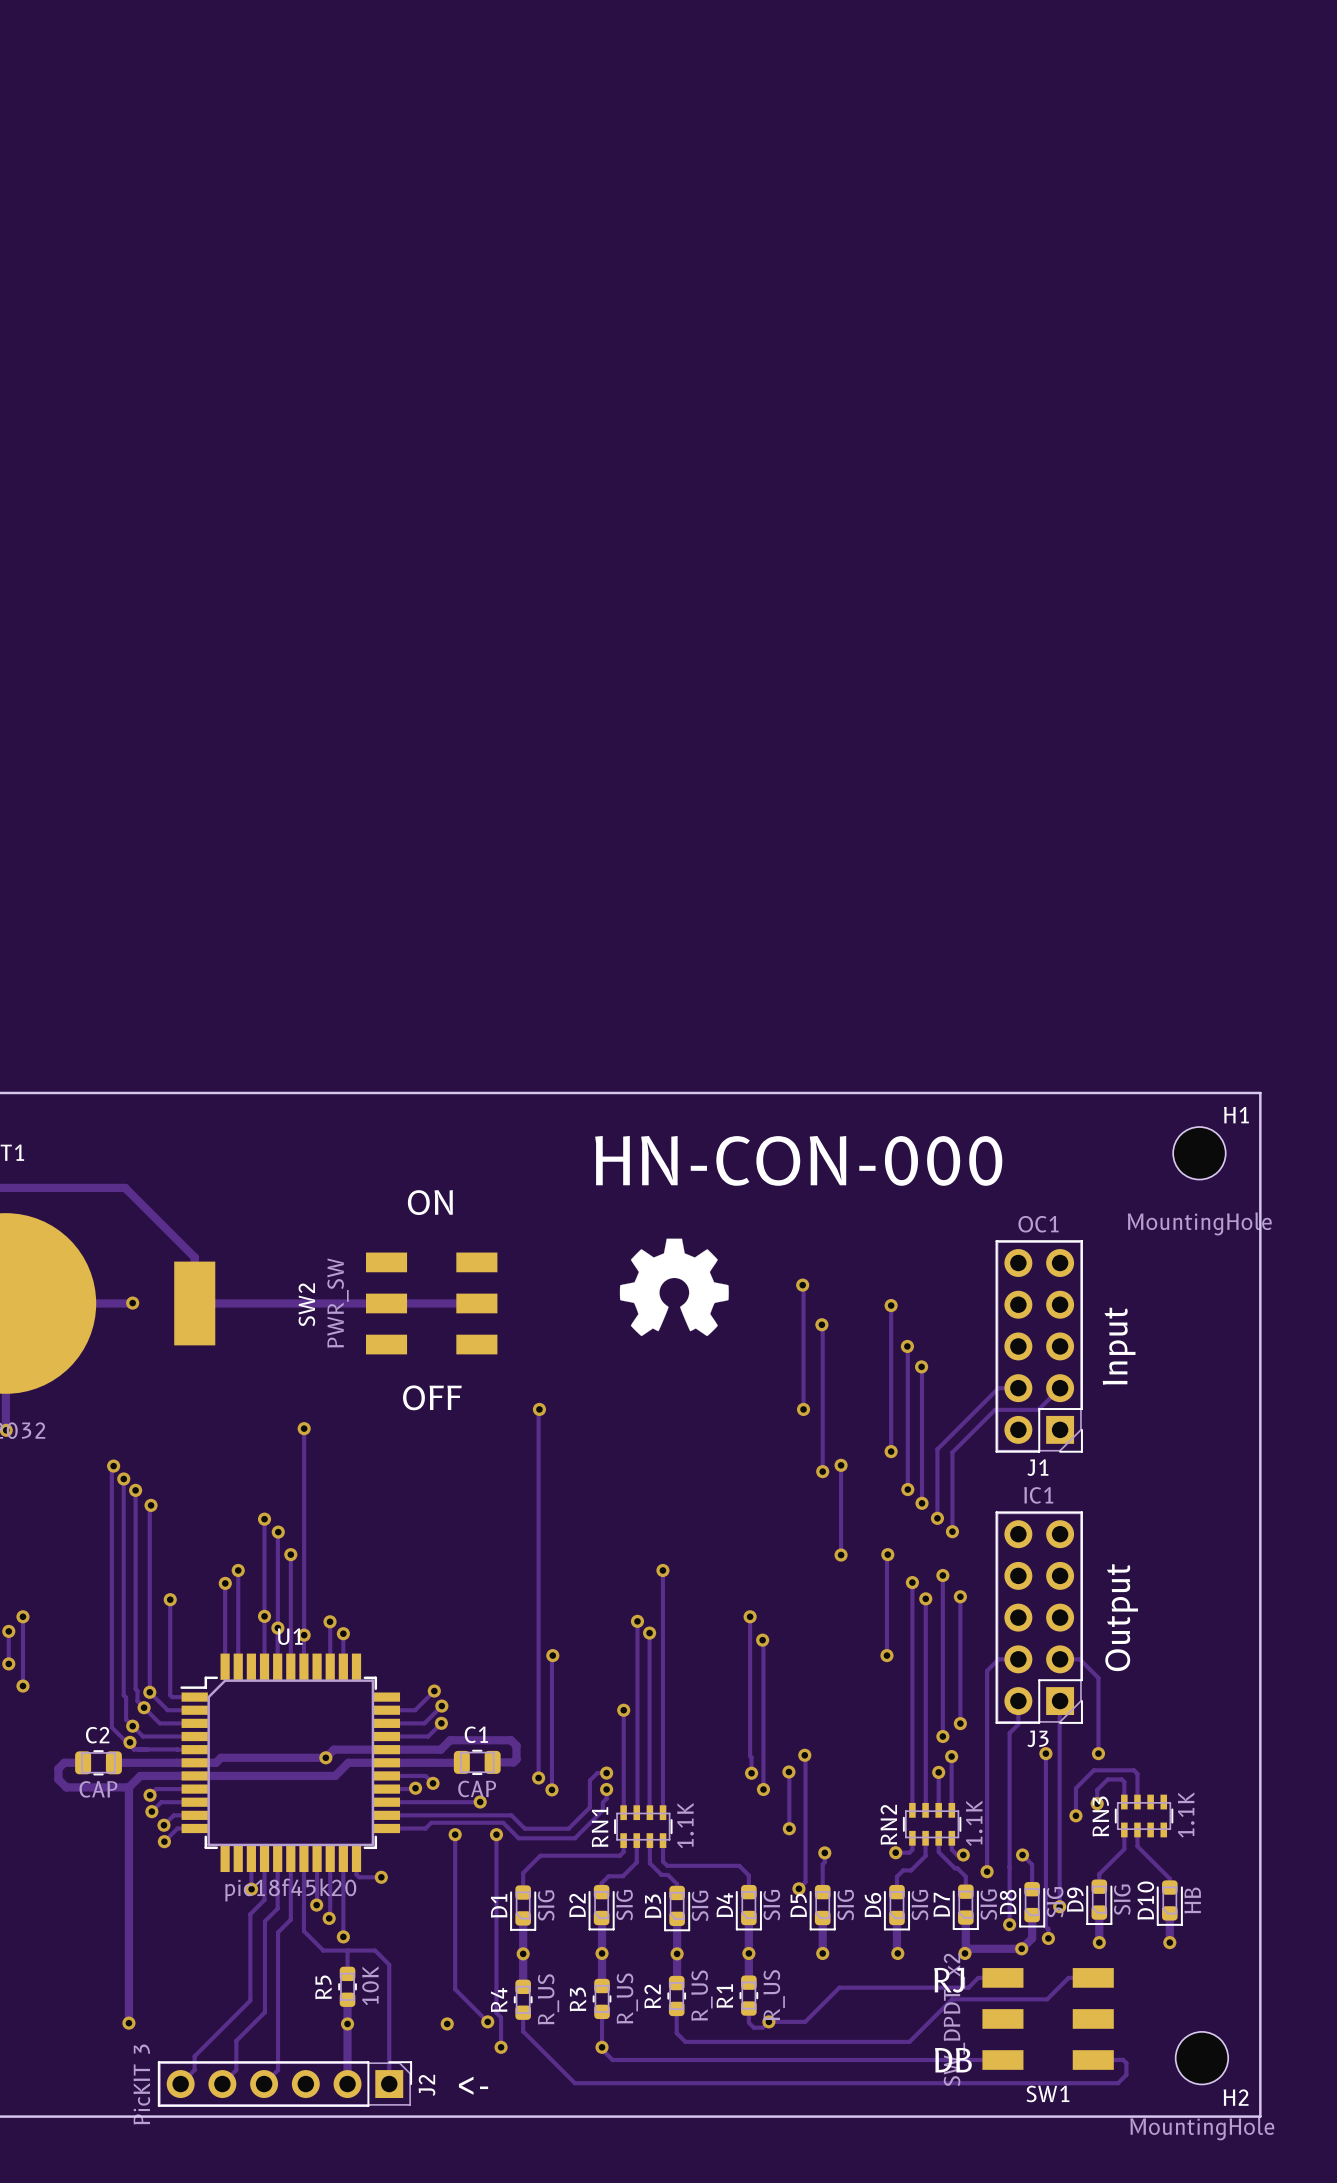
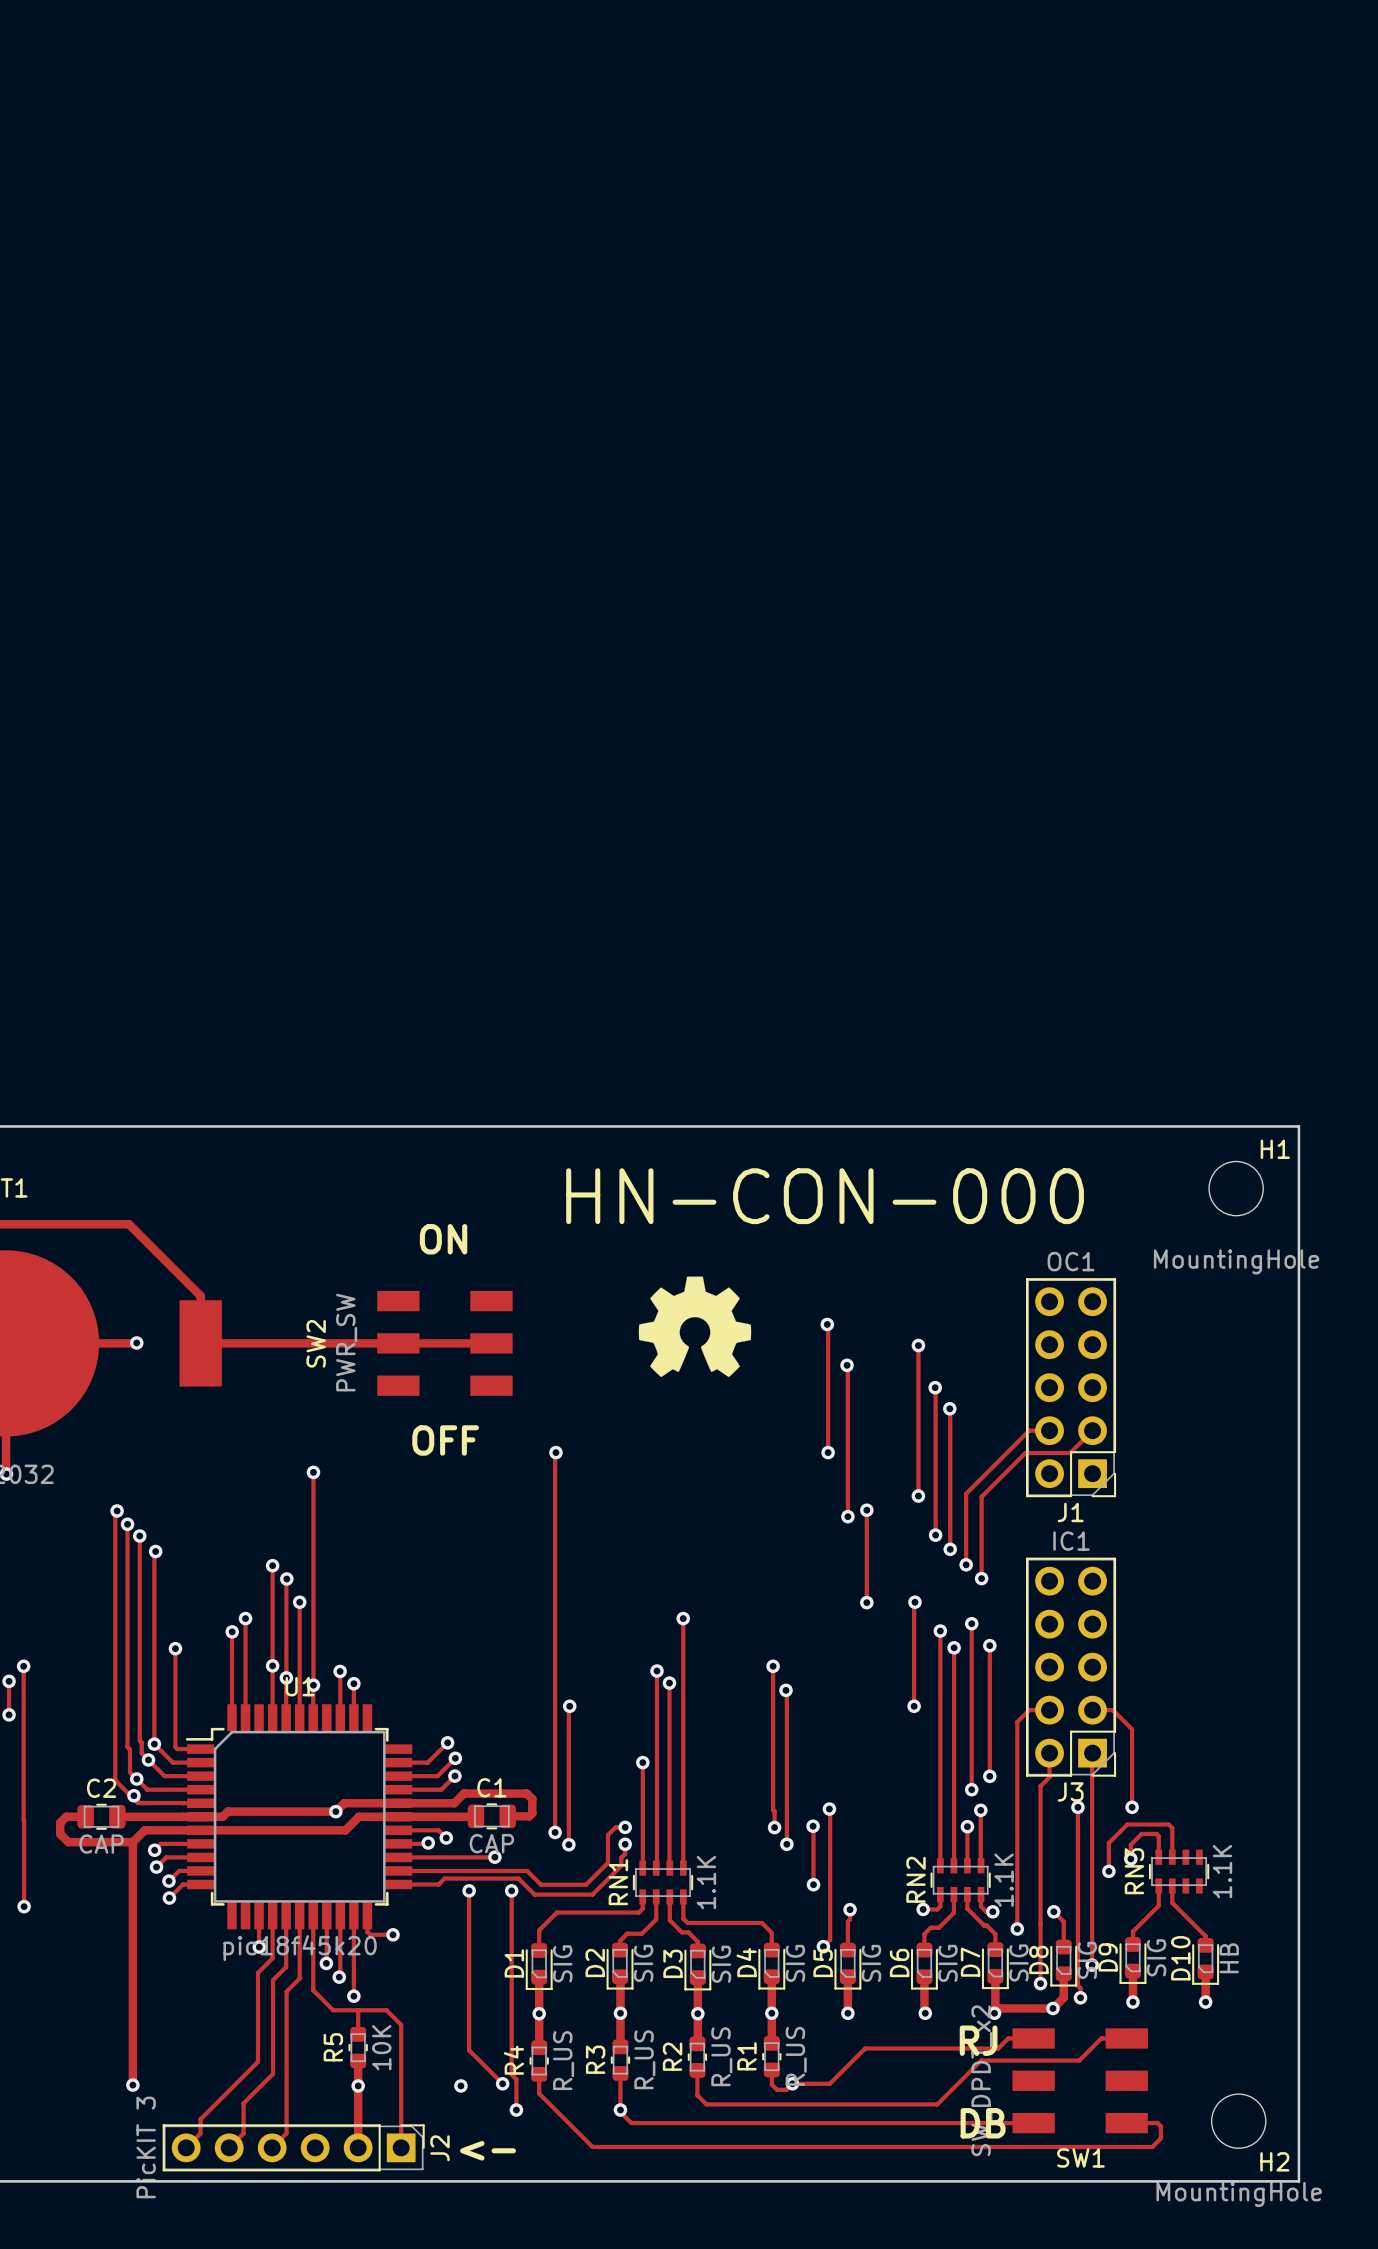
text: Input (1119, 1346) -> none
text: Output (1121, 1617) -> none
track: none -> (23, 1737) (24, 1906)
via: (22, 1686) -> none
via: none -> (24, 1906)

